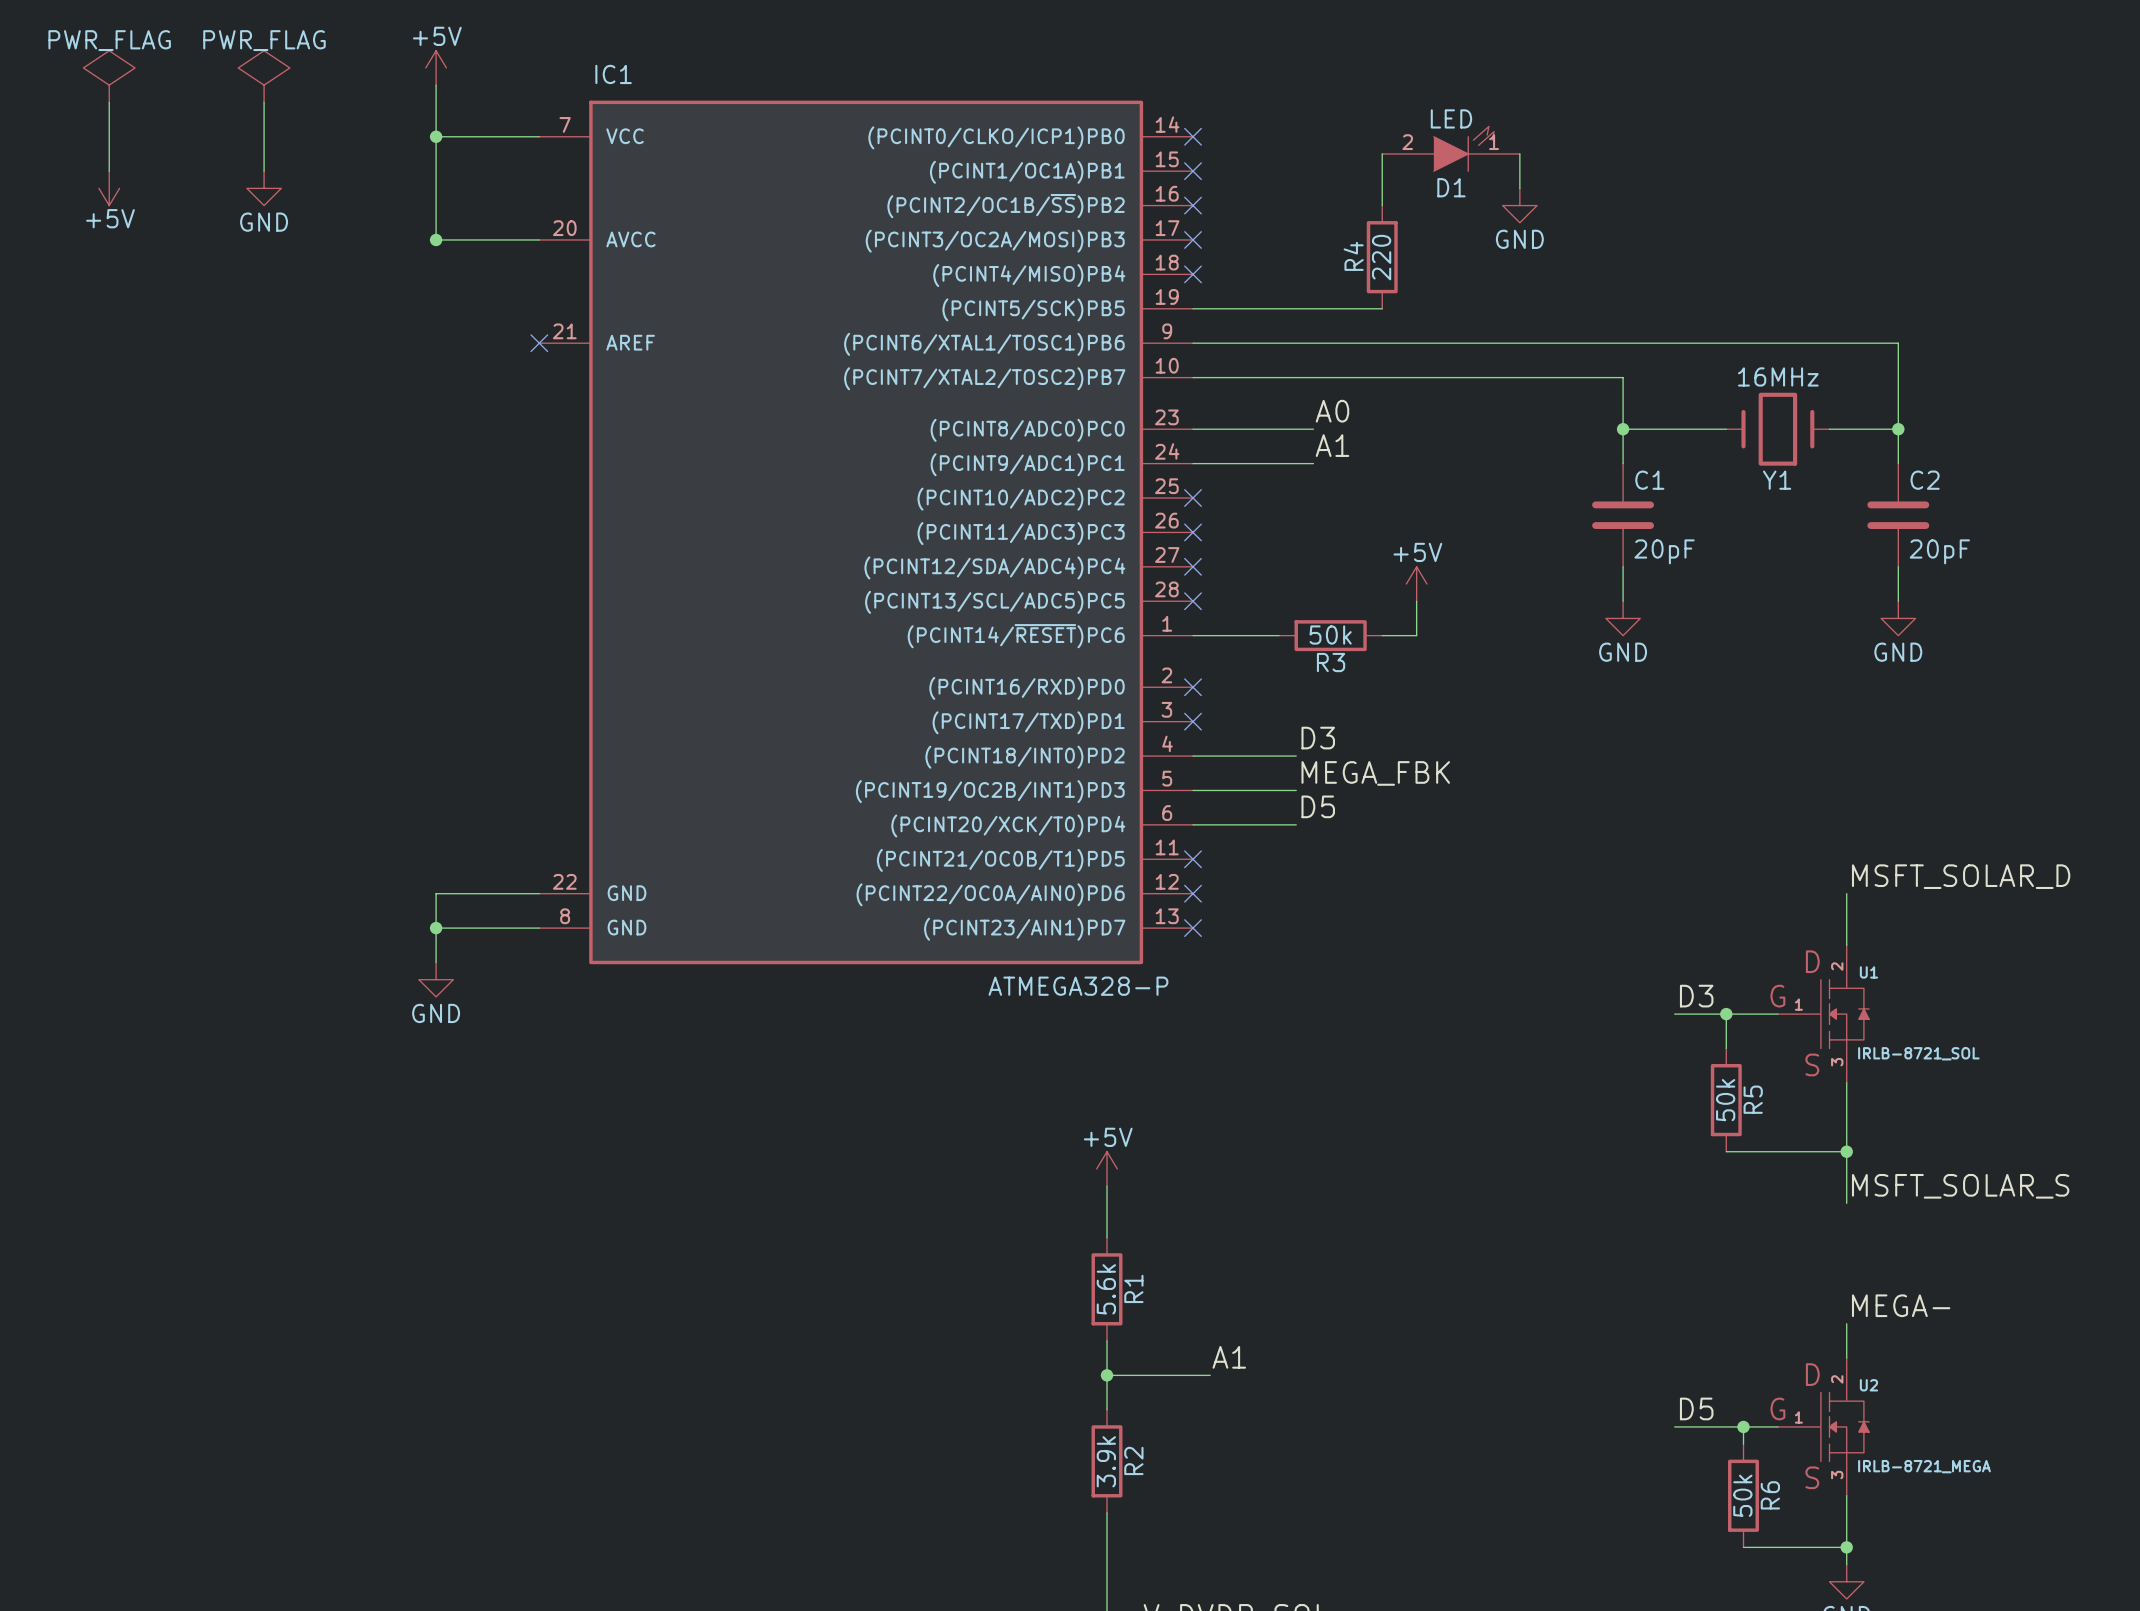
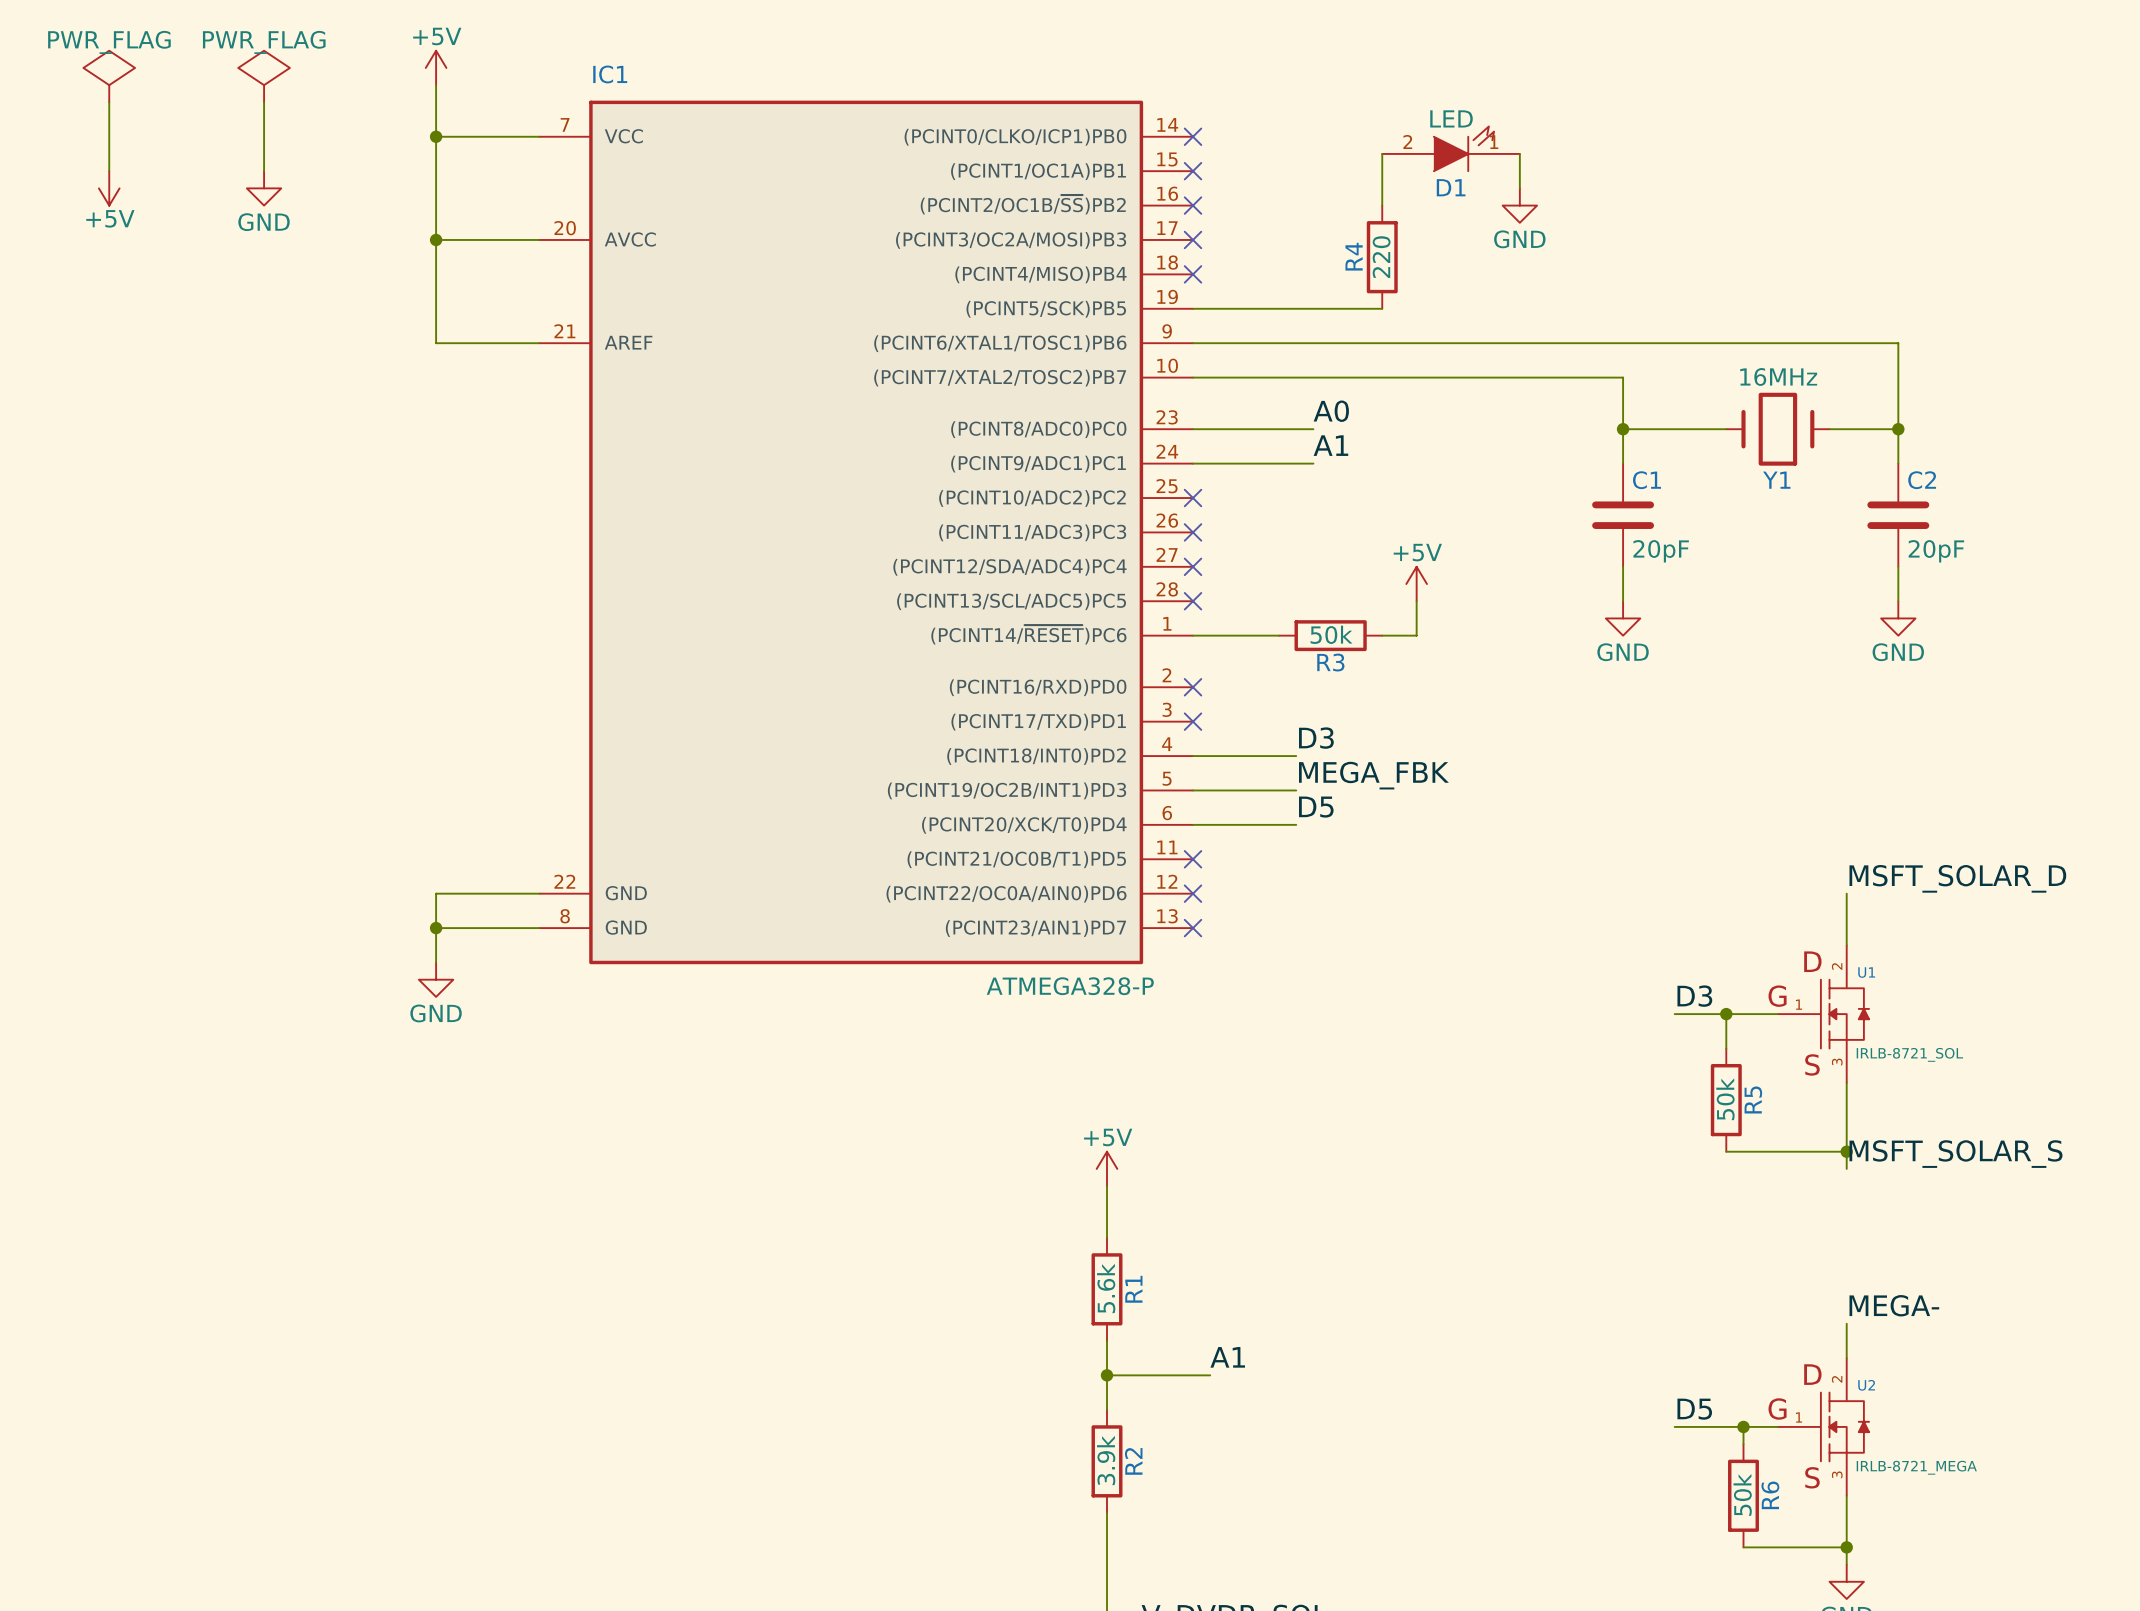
wire: none -> (436, 239) (436, 343) (539, 343)
no-connect mark: (539, 343) -> none
wire: (1846, 1168) (1846, 1203) -> none
label position: MSFT_SOLAR_S (1960, 1186) -> MSFT_SOLAR_S (1955, 1154)

